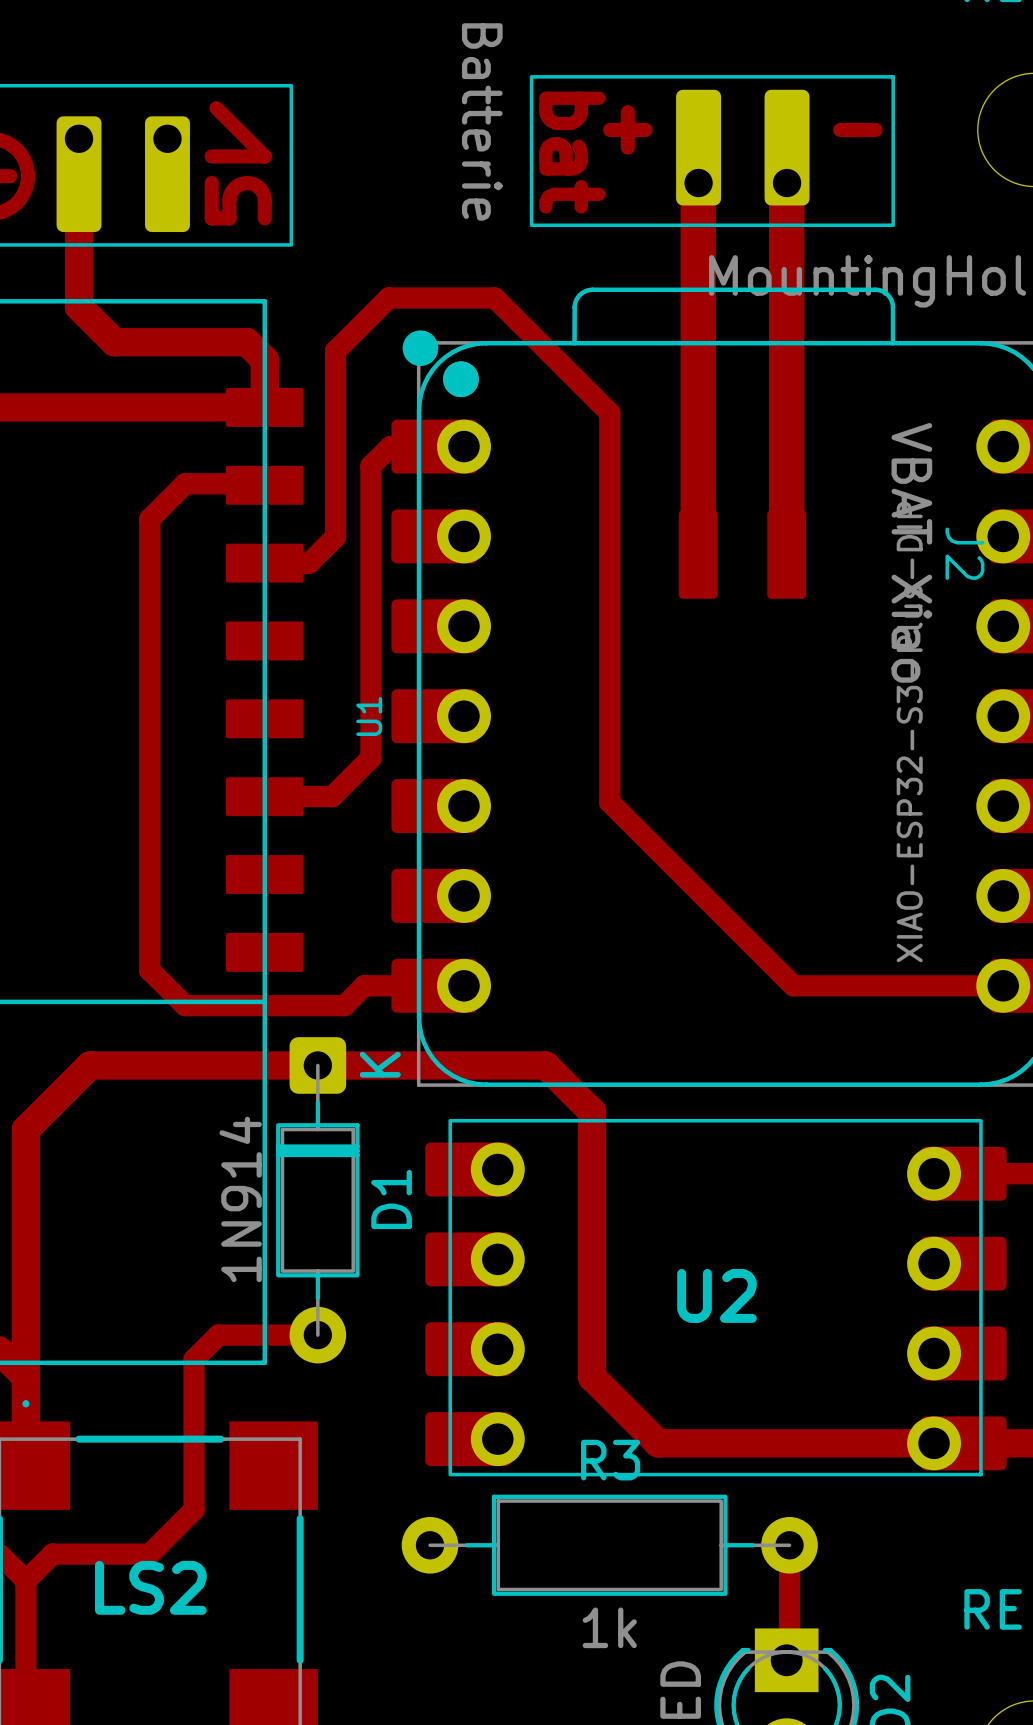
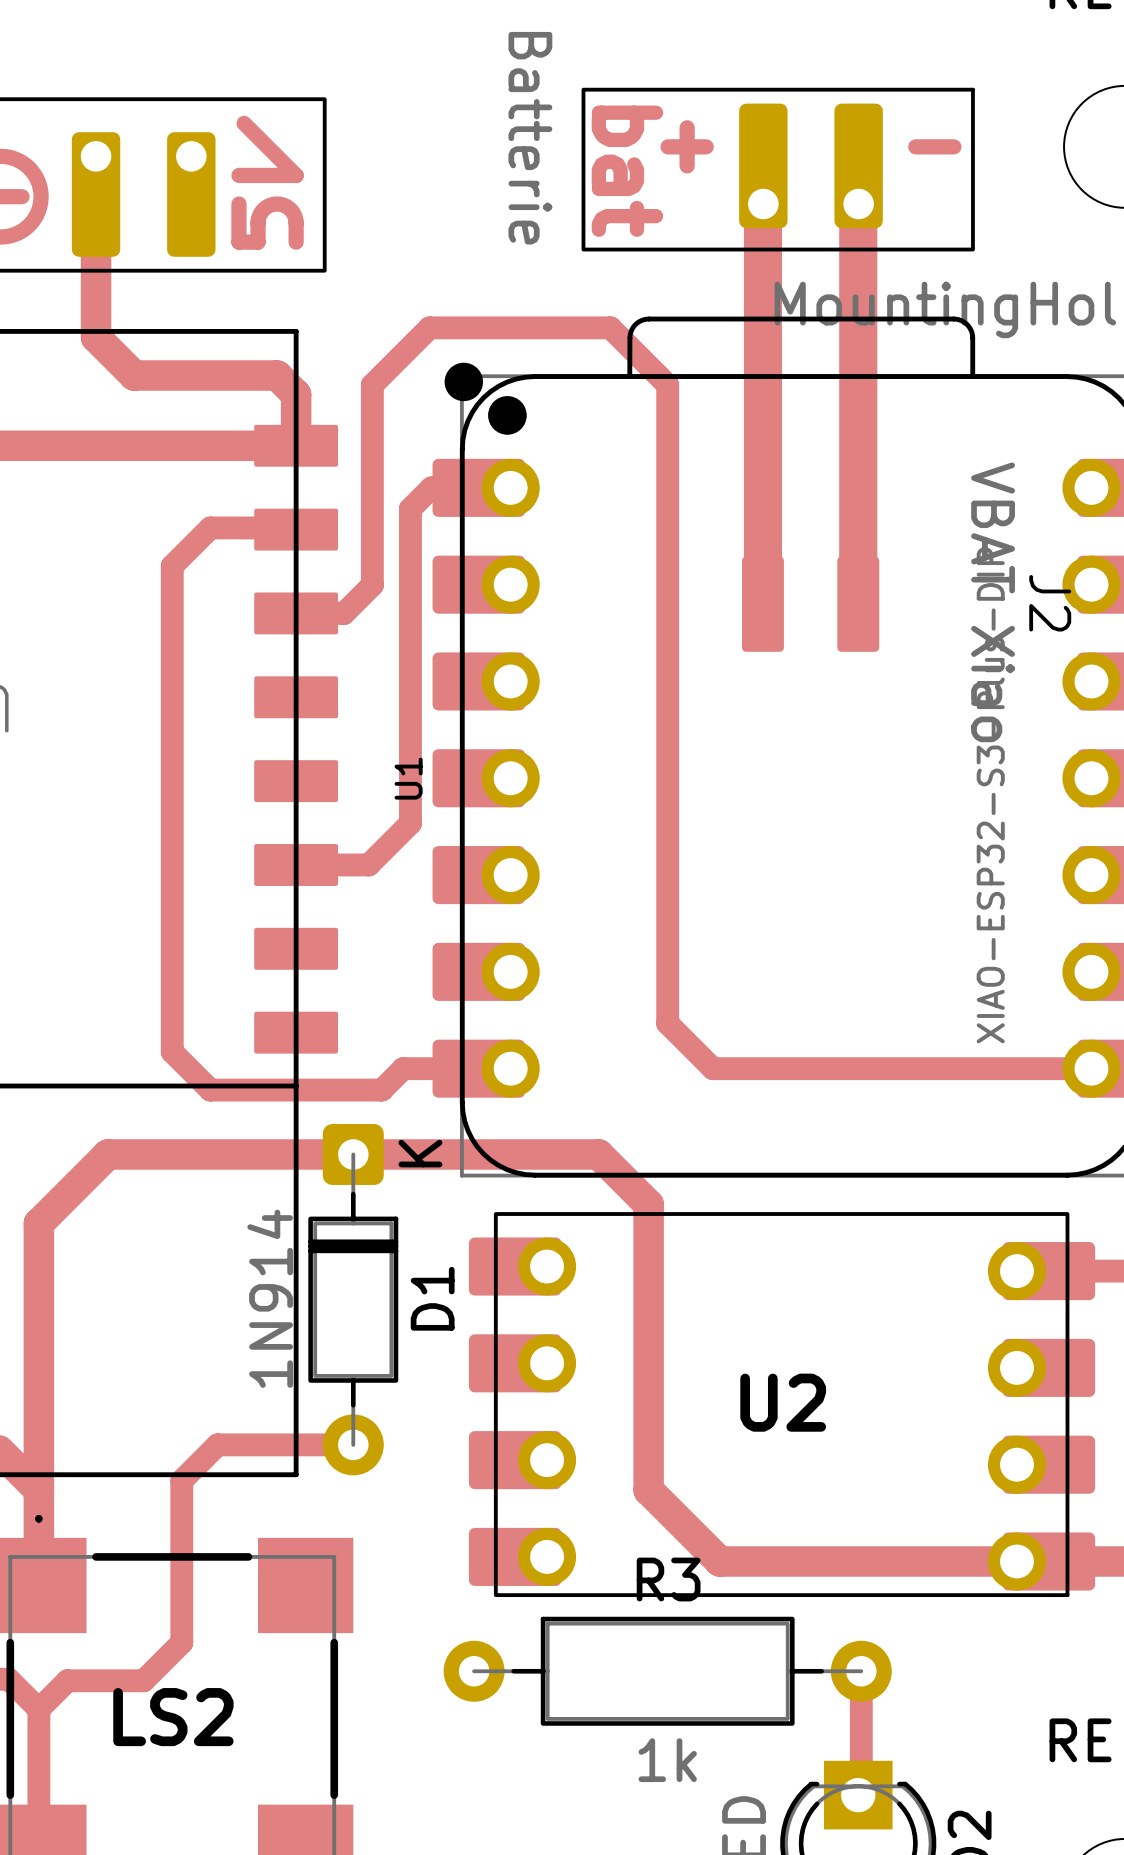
track: (494, 298) (609, 413) -> (543, 327) (610, 327) (667, 385) (667, 451)
track: (609, 802) (793, 985) -> (667, 870) (667, 1023) (712, 1068) (865, 1068)
track: (218, 1335) (194, 1359) (194, 1509) (149, 1554) (123, 1554) -> (246, 1444) (217, 1444) (181, 1480) (181, 1642) (143, 1680)

